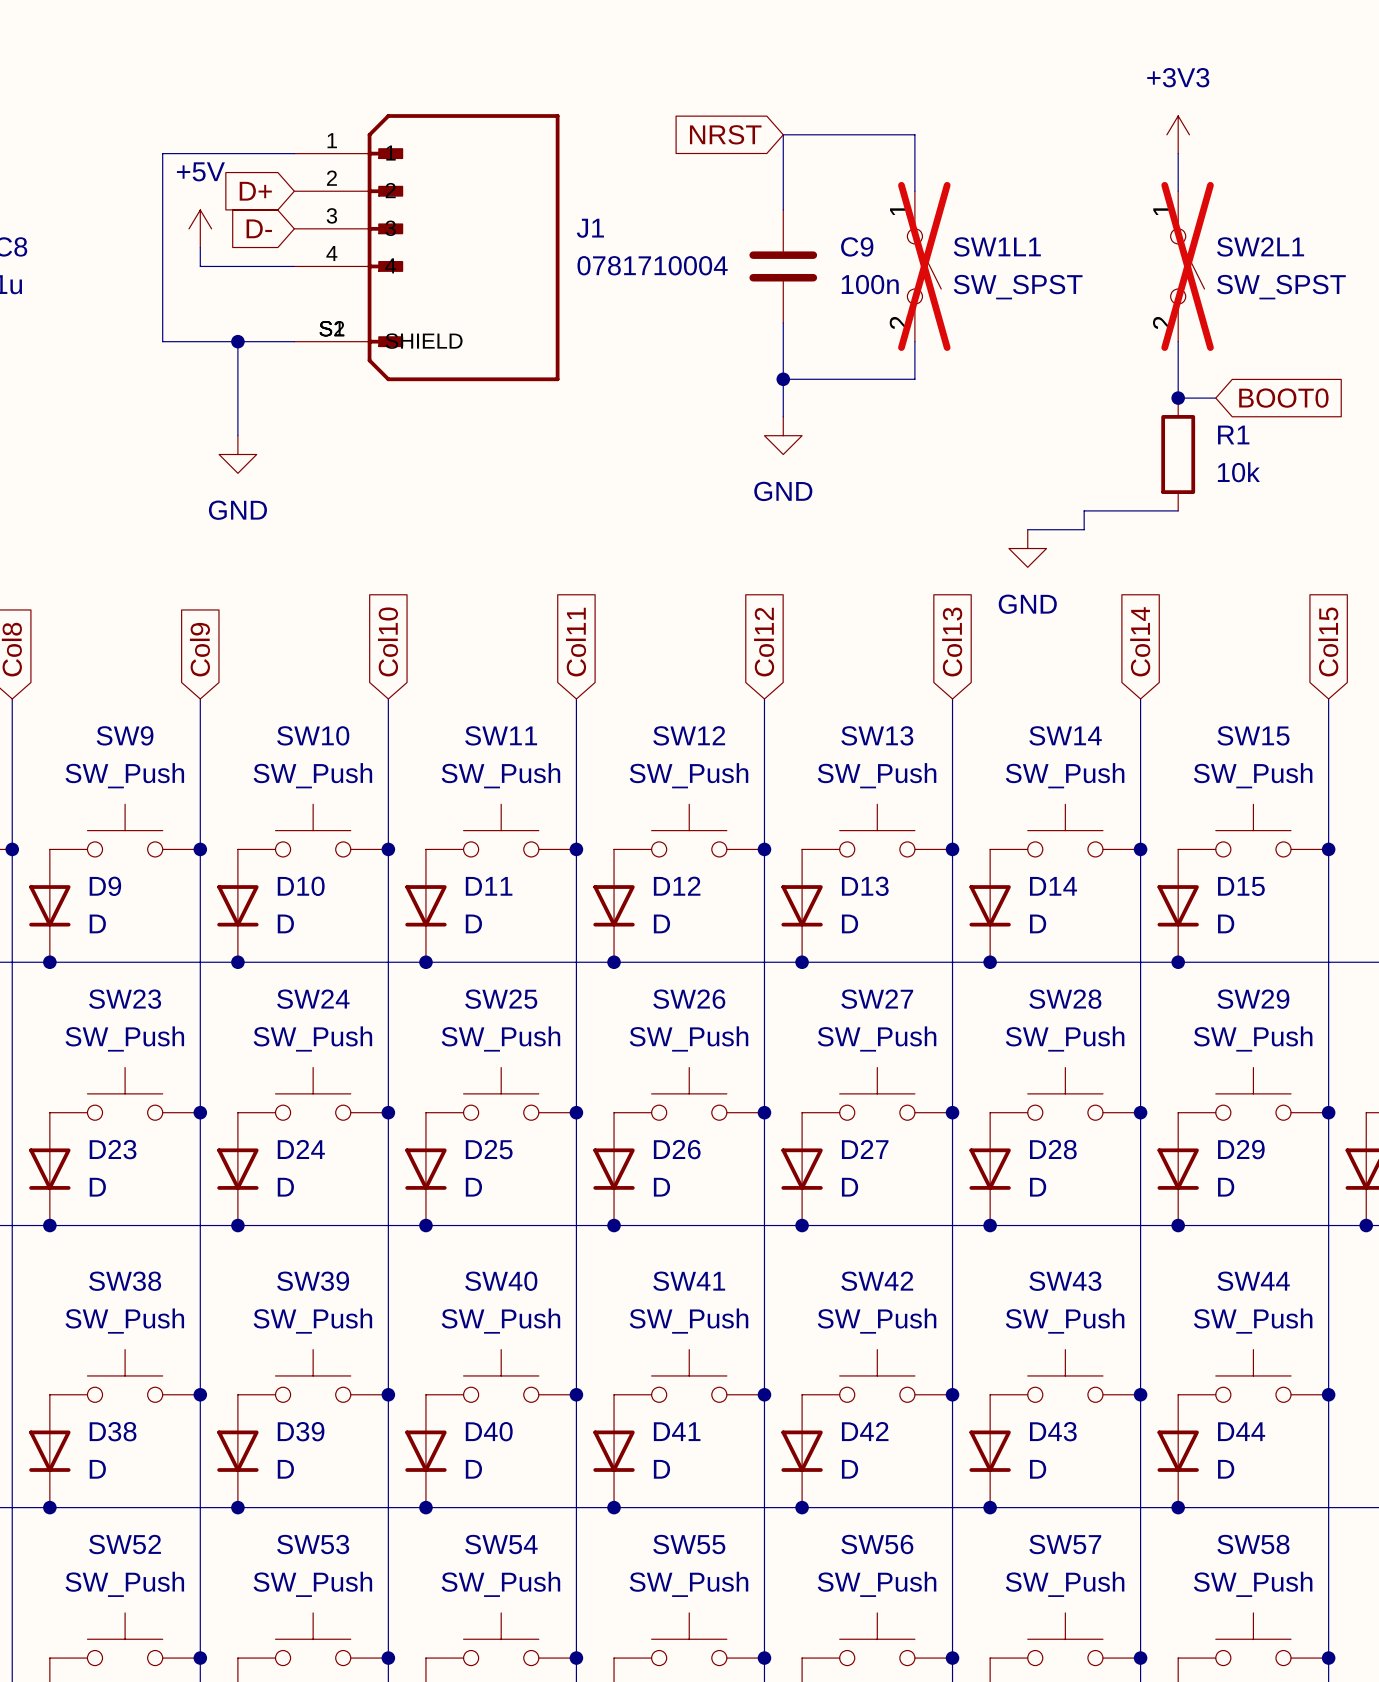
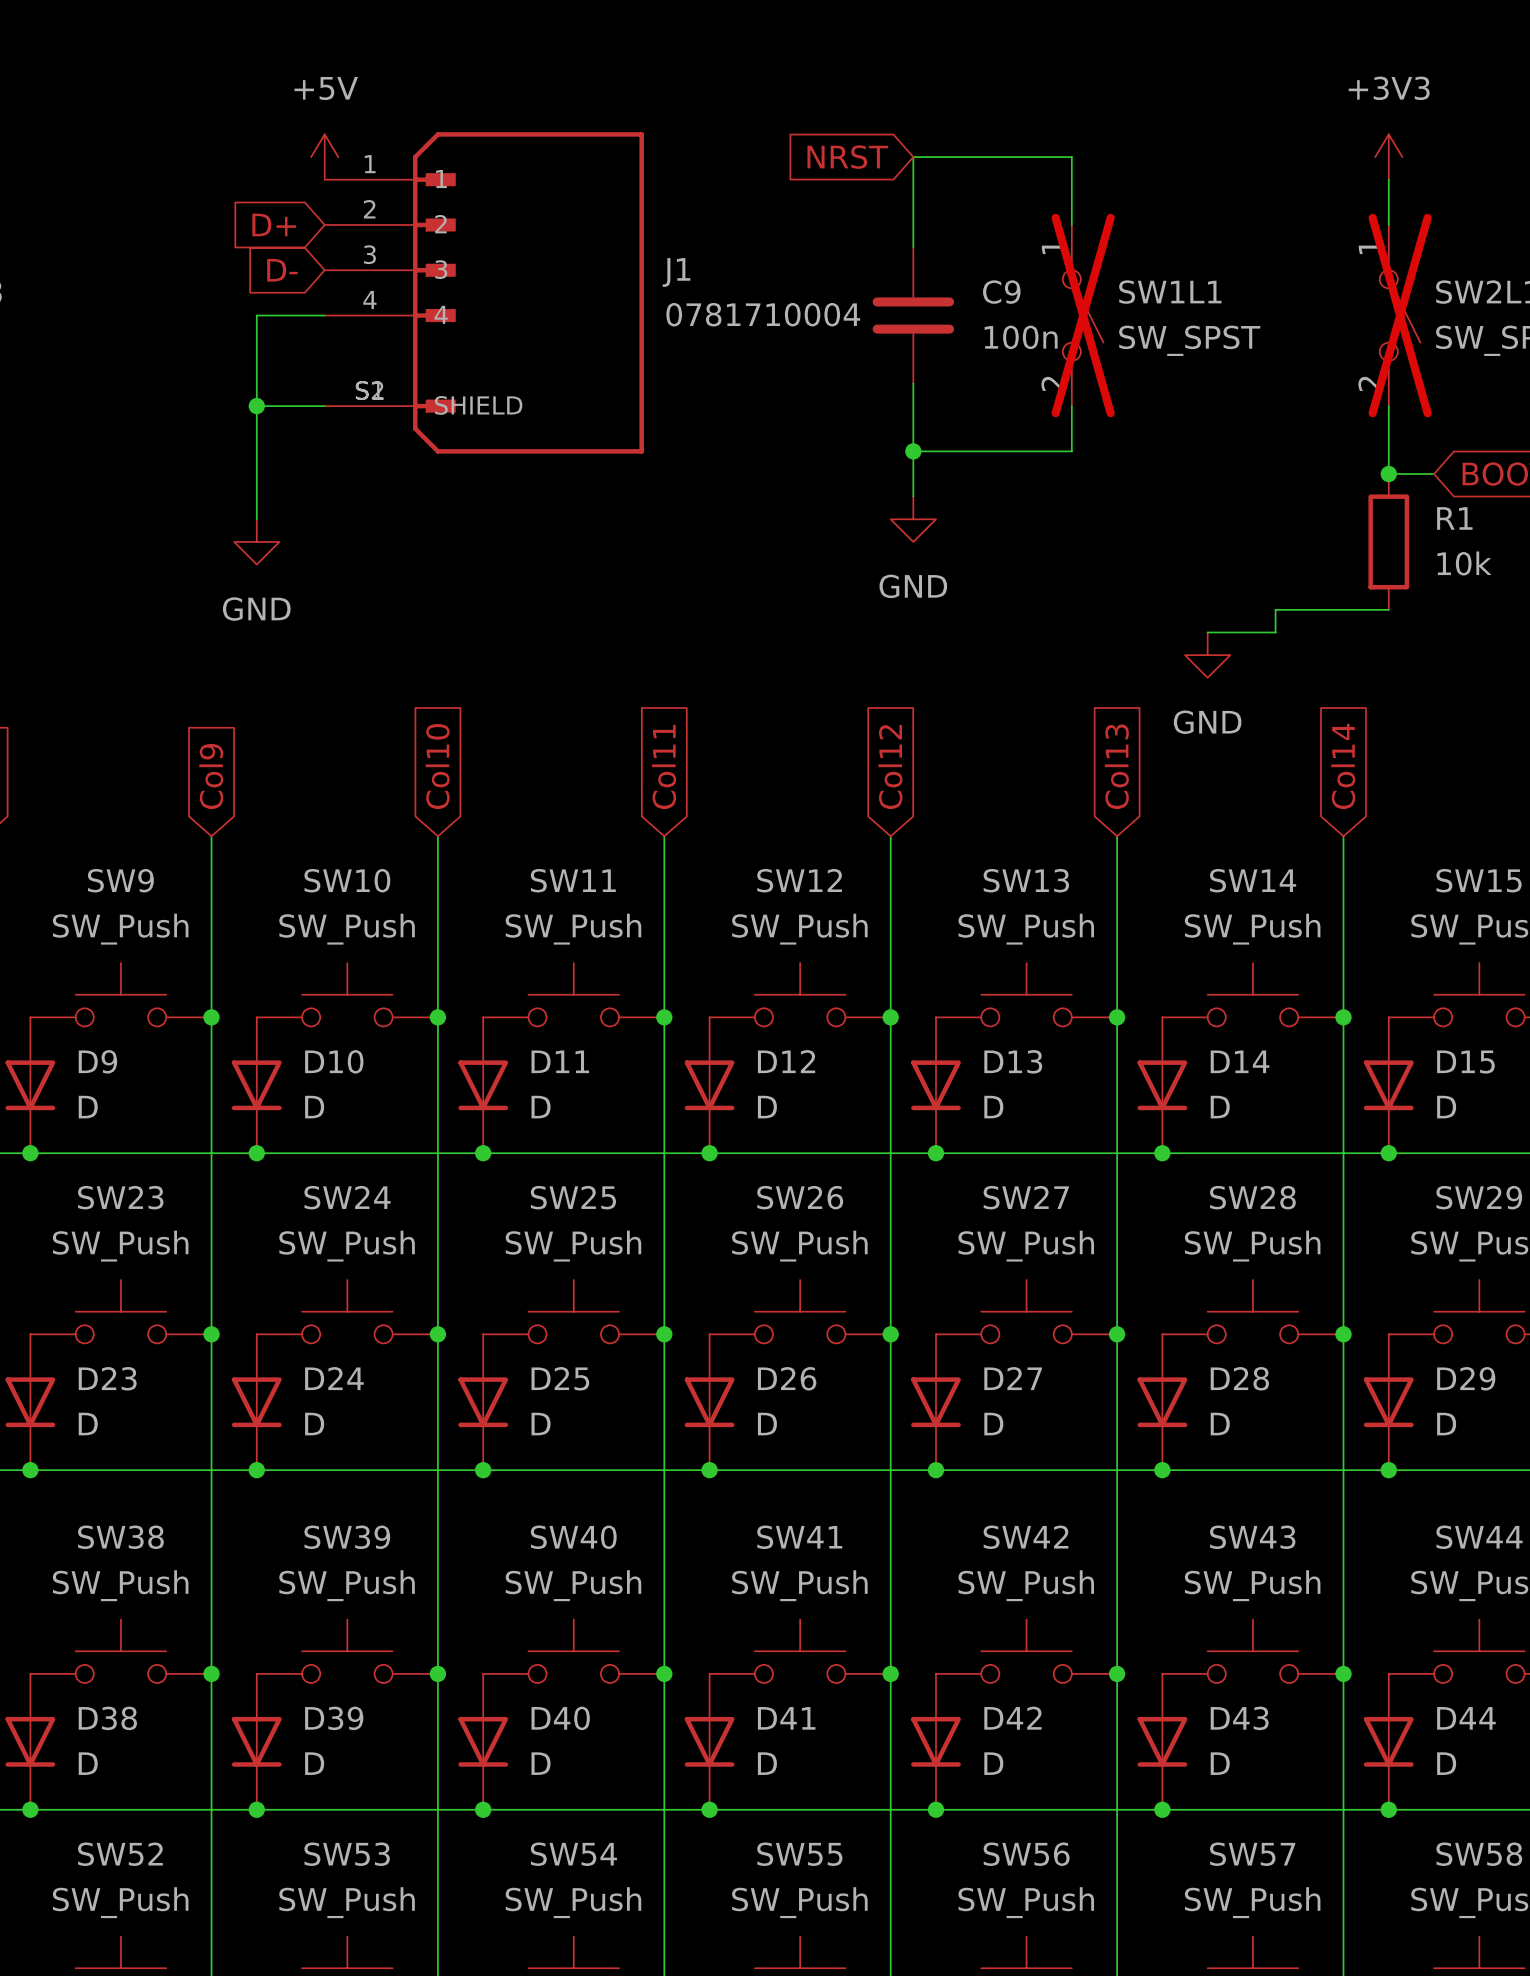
wire: (294, 153) (162, 153) (162, 341) (237, 341) -> none
power symbol position: +5V (200, 228) -> +5V (324, 157)
wire: (200, 247) (200, 266) (237, 266) -> (256, 406) (256, 315)

